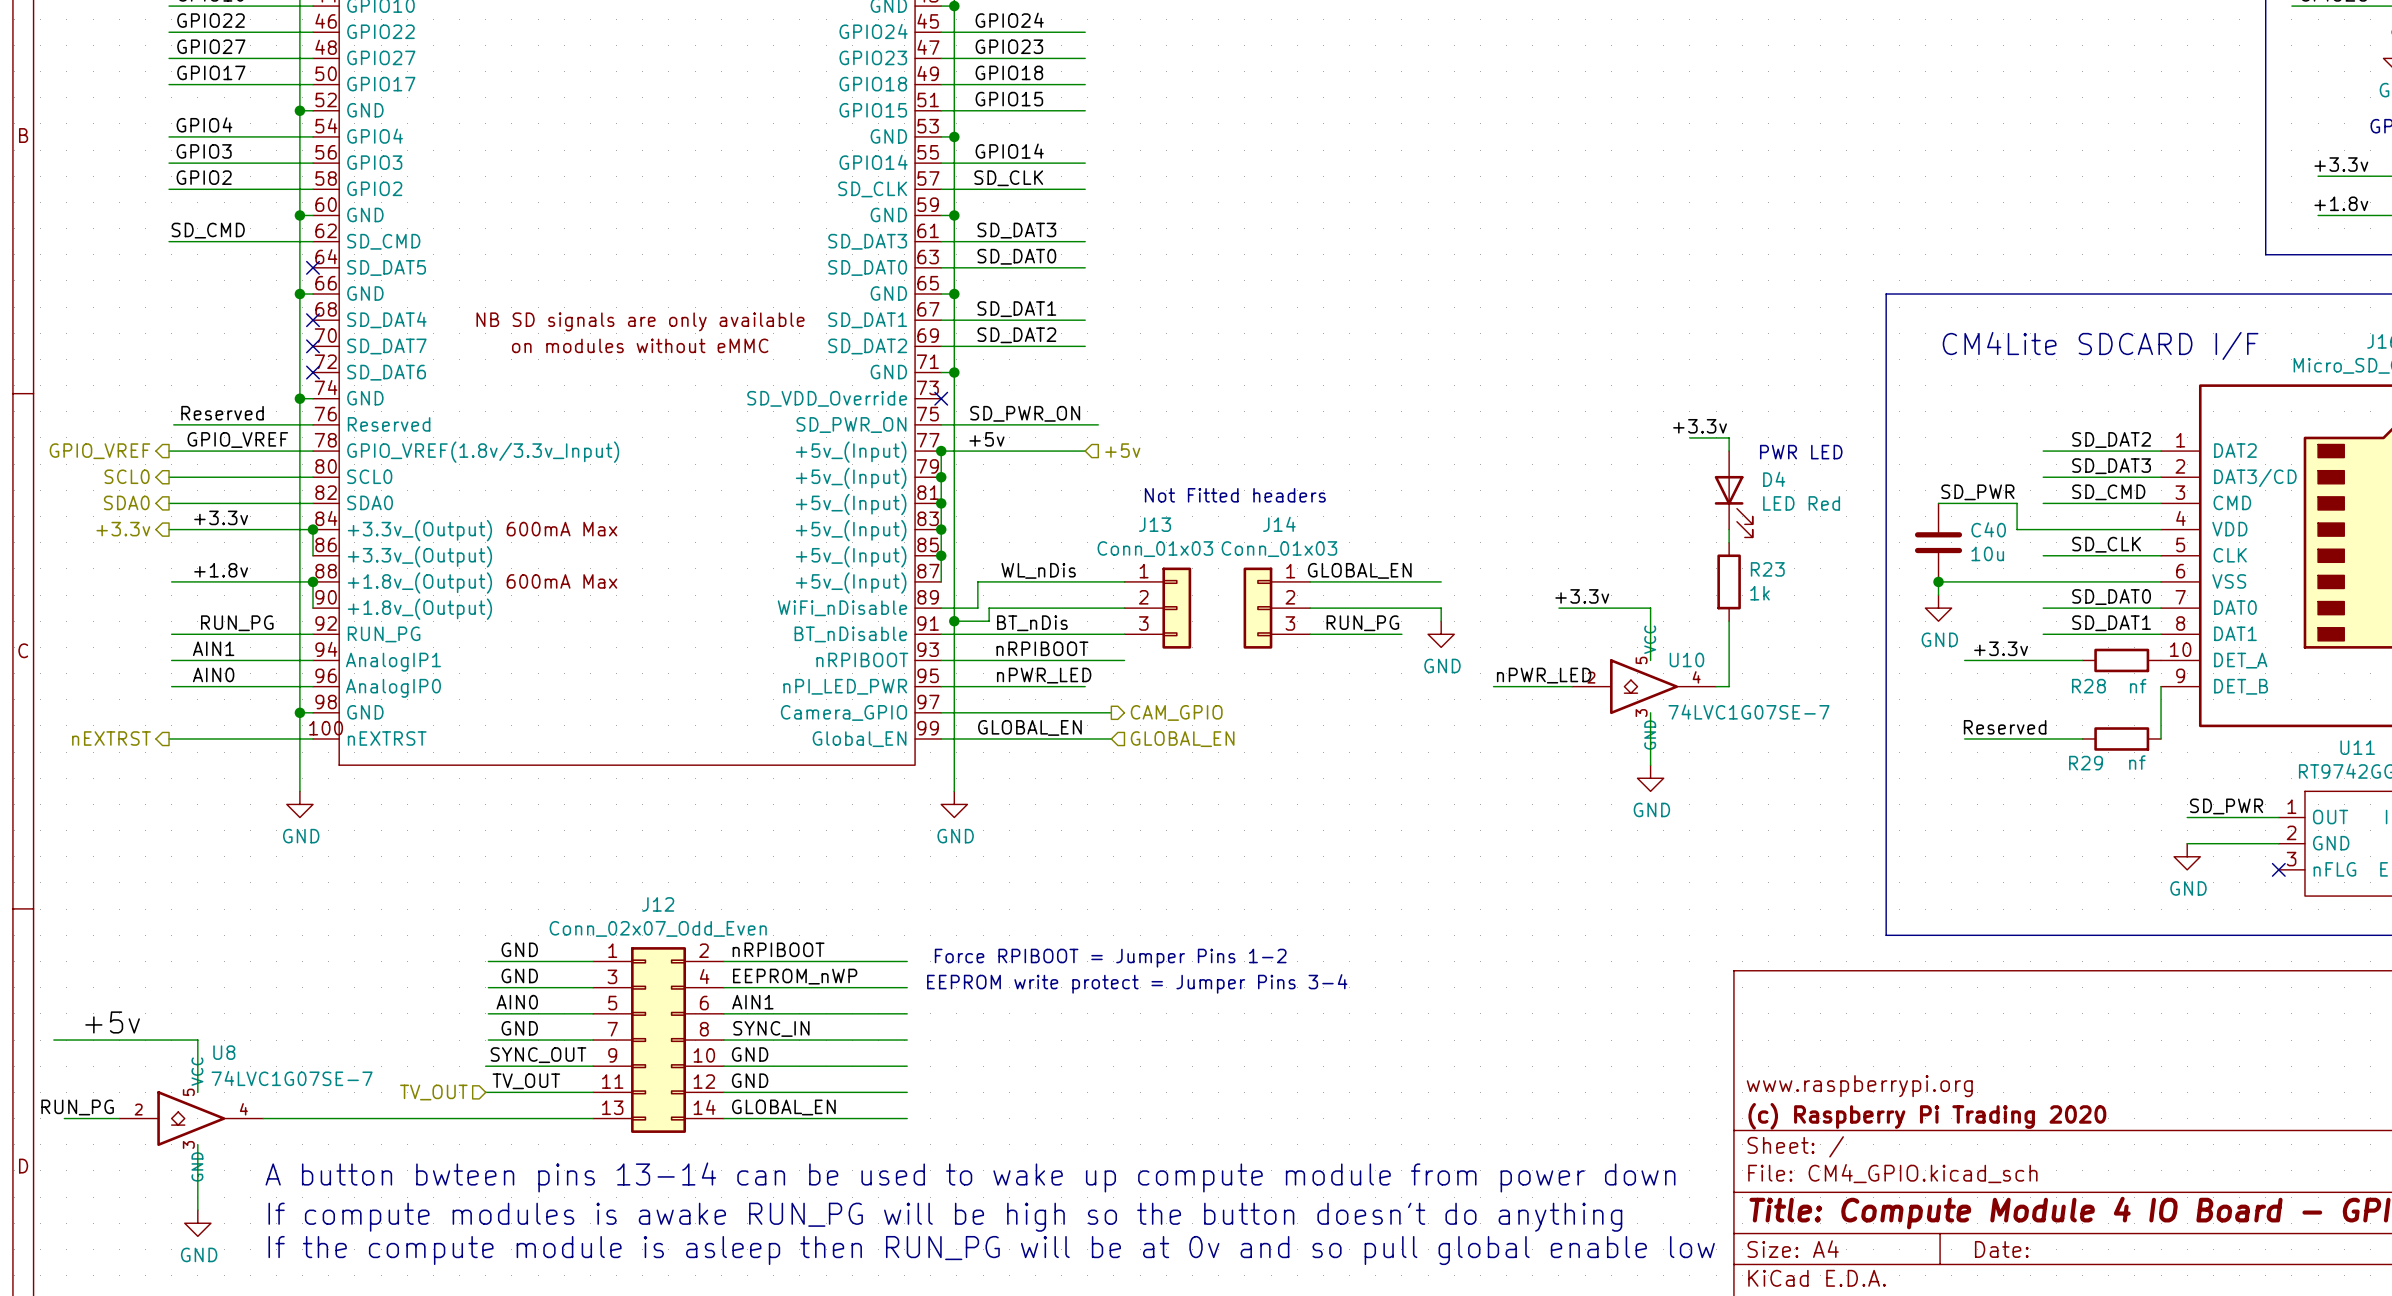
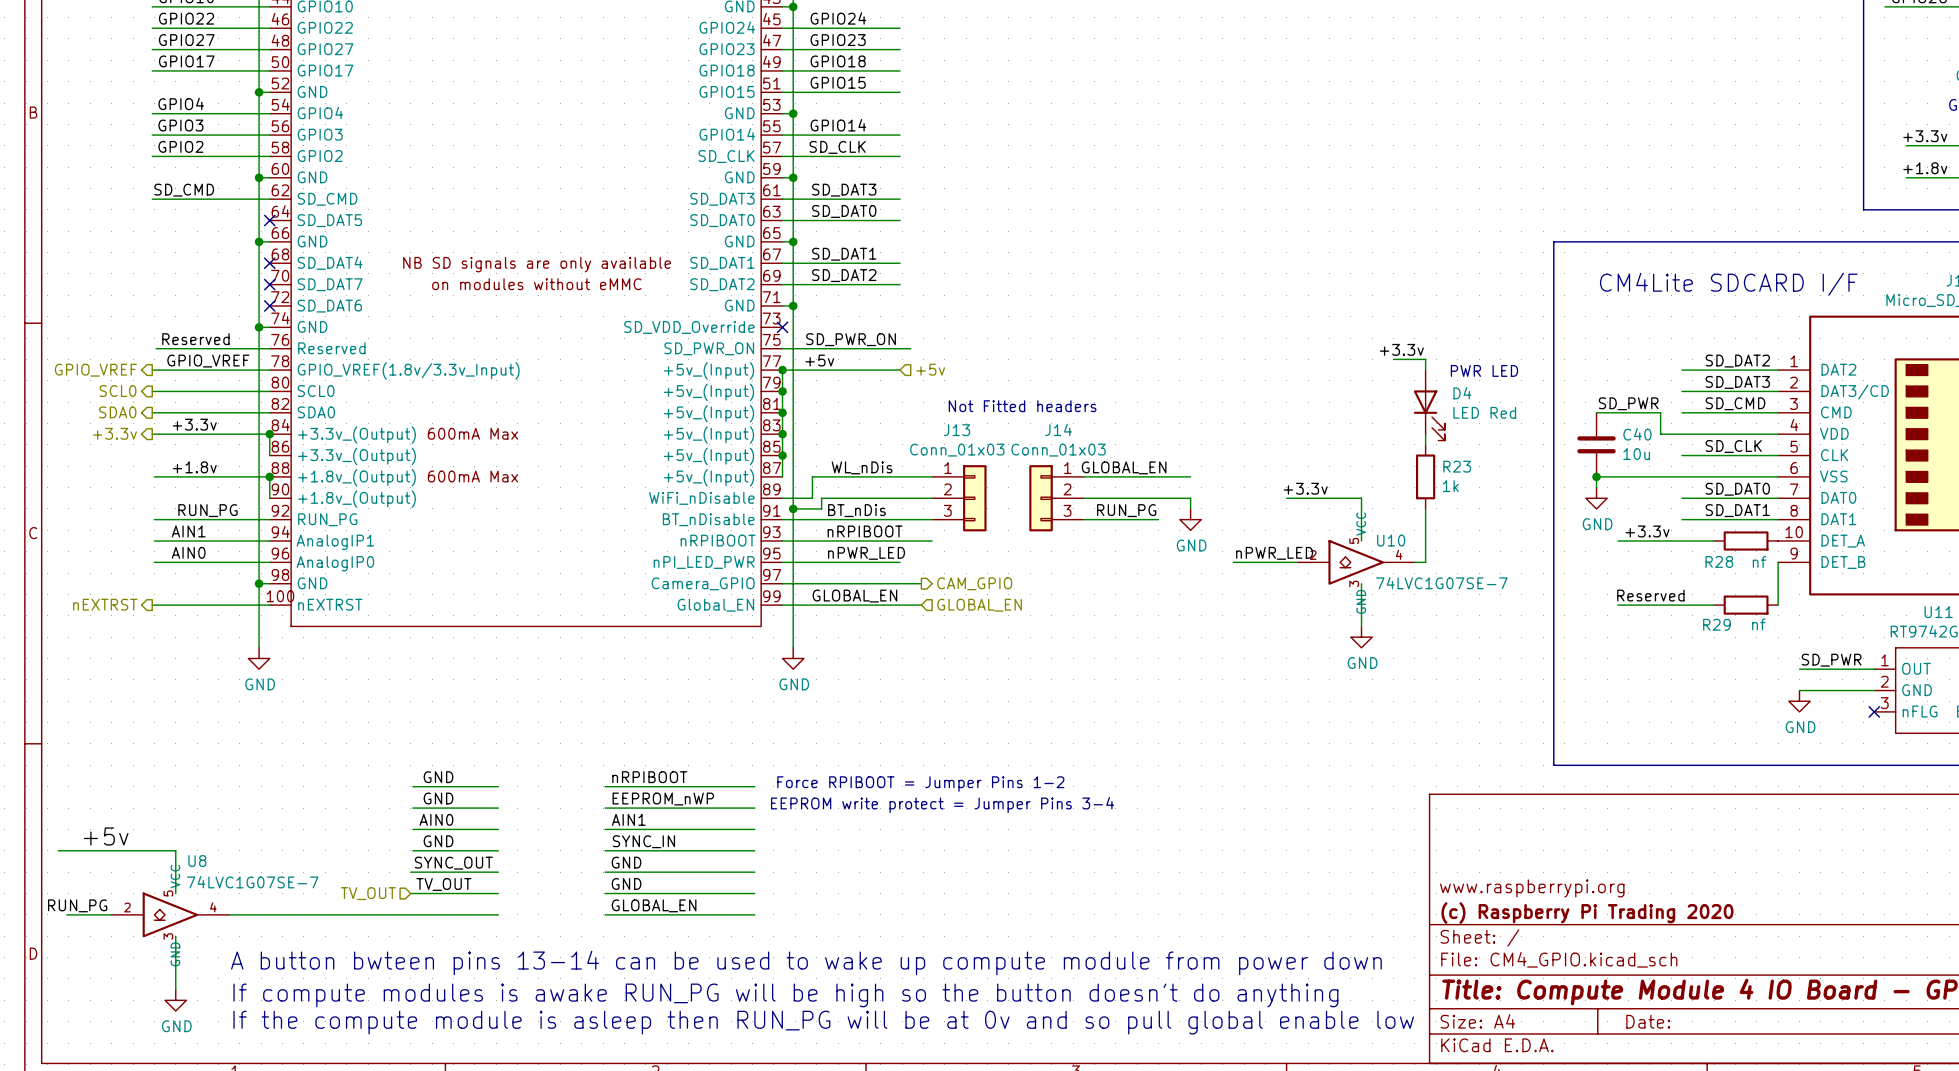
J12: Conn_02x07_Odd_Even (658, 1040) -> none

